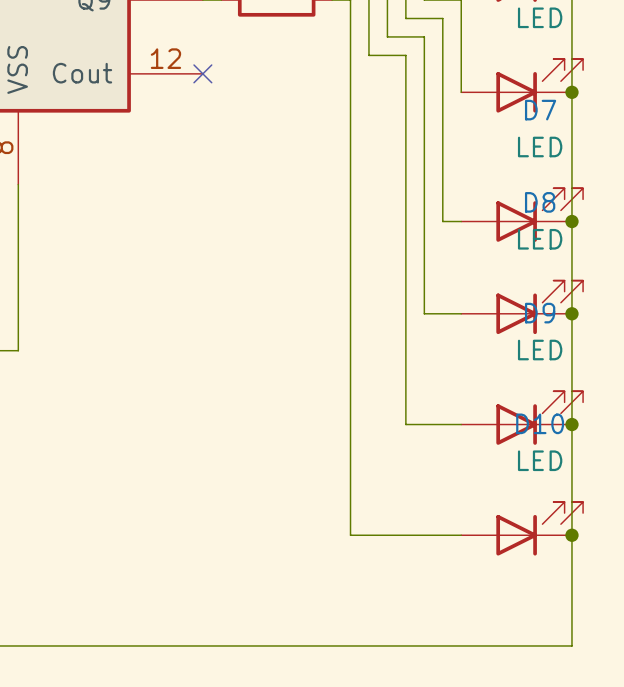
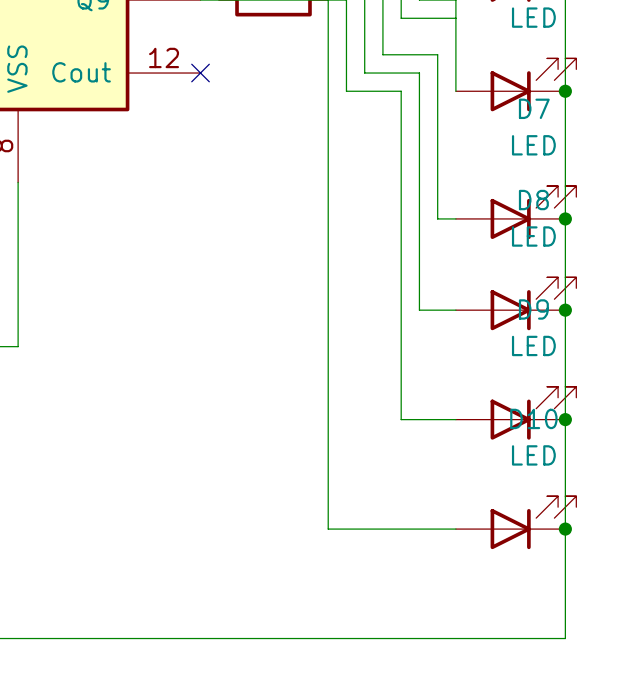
wire: (442, 18) (442, 55) -> (437, 18) (455, 18)
wire: (387, 36) (424, 36) (424, 73) -> (364, 54) (364, 73) (419, 73)
wire: (368, 55) (387, 55) -> (382, 36) (382, 54)
wire: (405, 55) (405, 92) -> (401, 54) (437, 54)
wire: (350, 92) (350, 535) -> (218, 0) (328, 0) (328, 529) (346, 529)
wire: none -> (346, 91) (401, 91)

